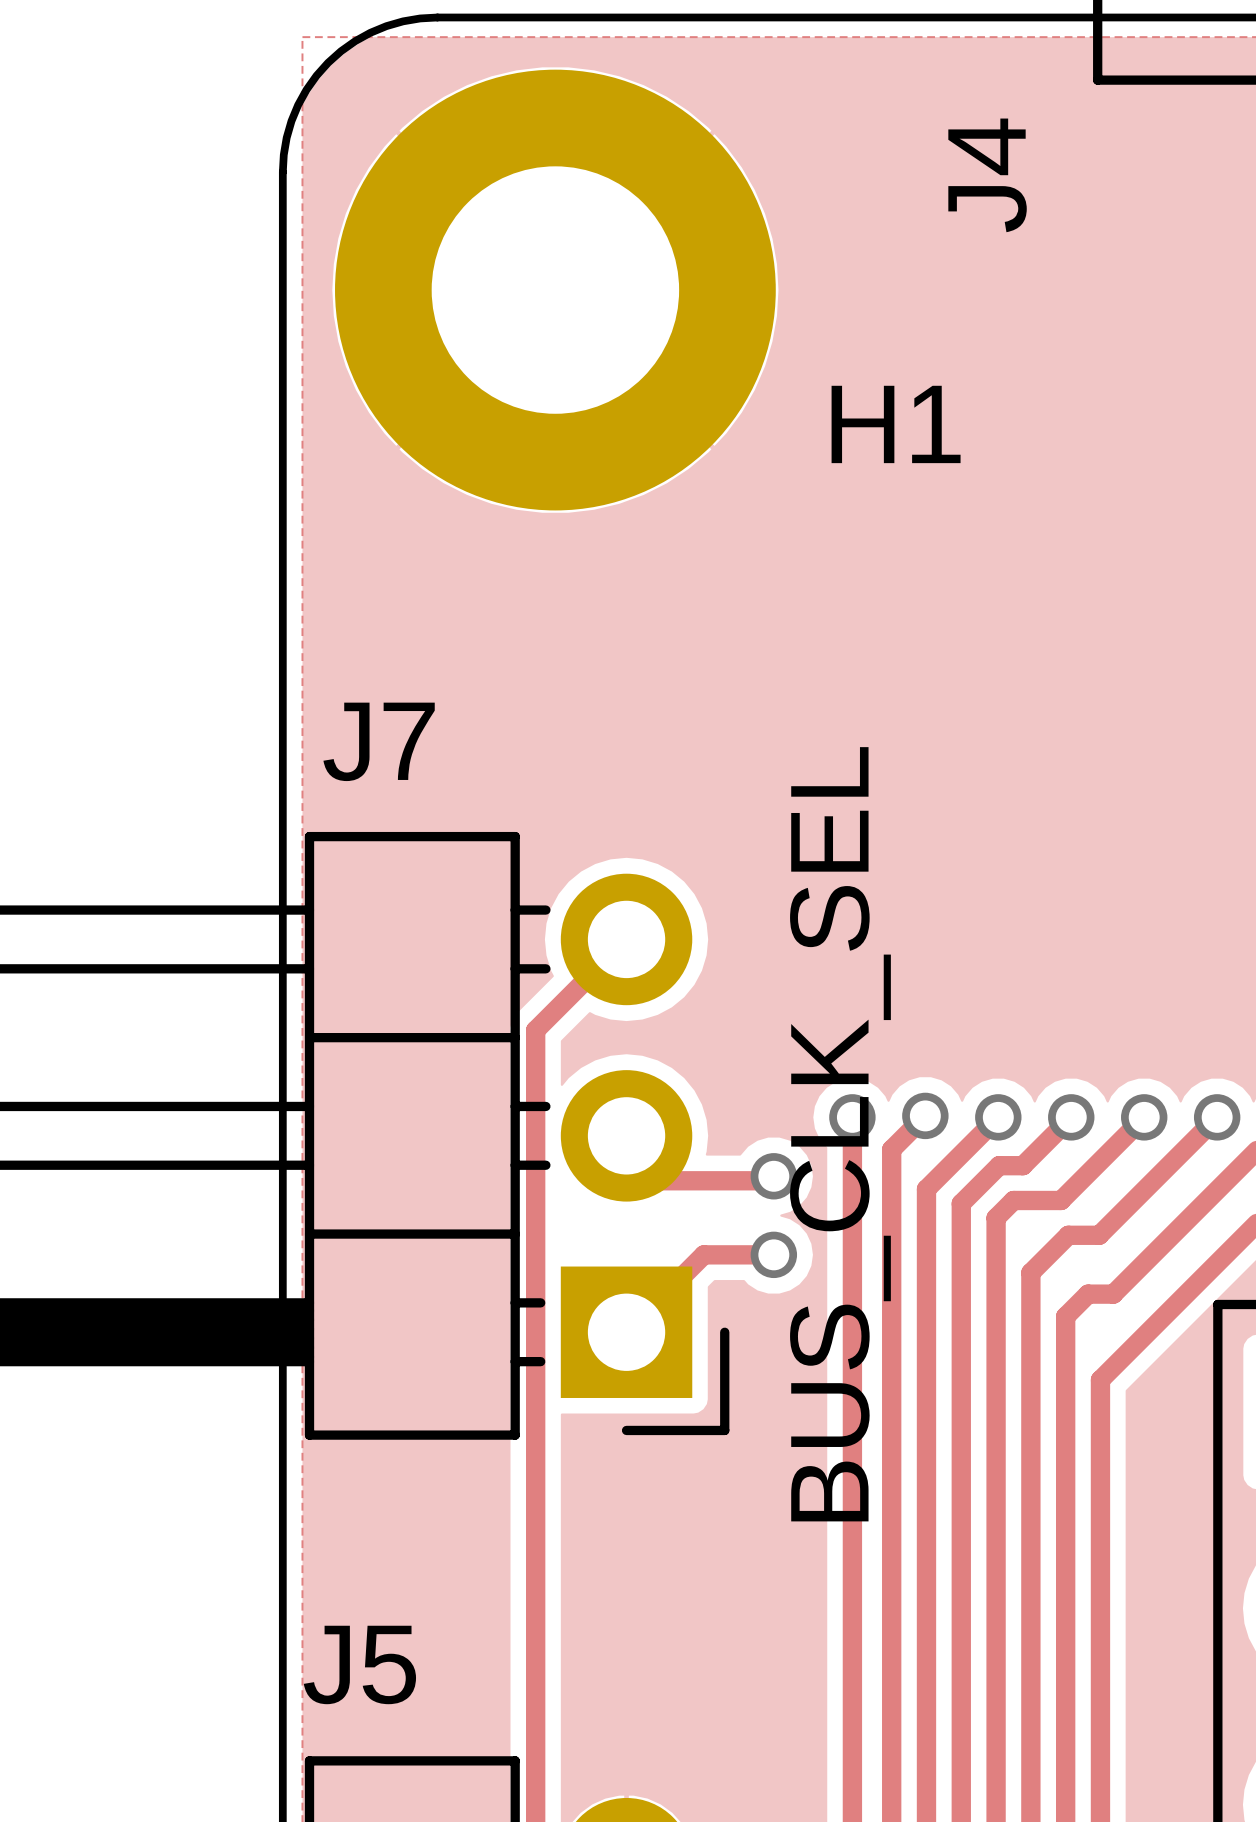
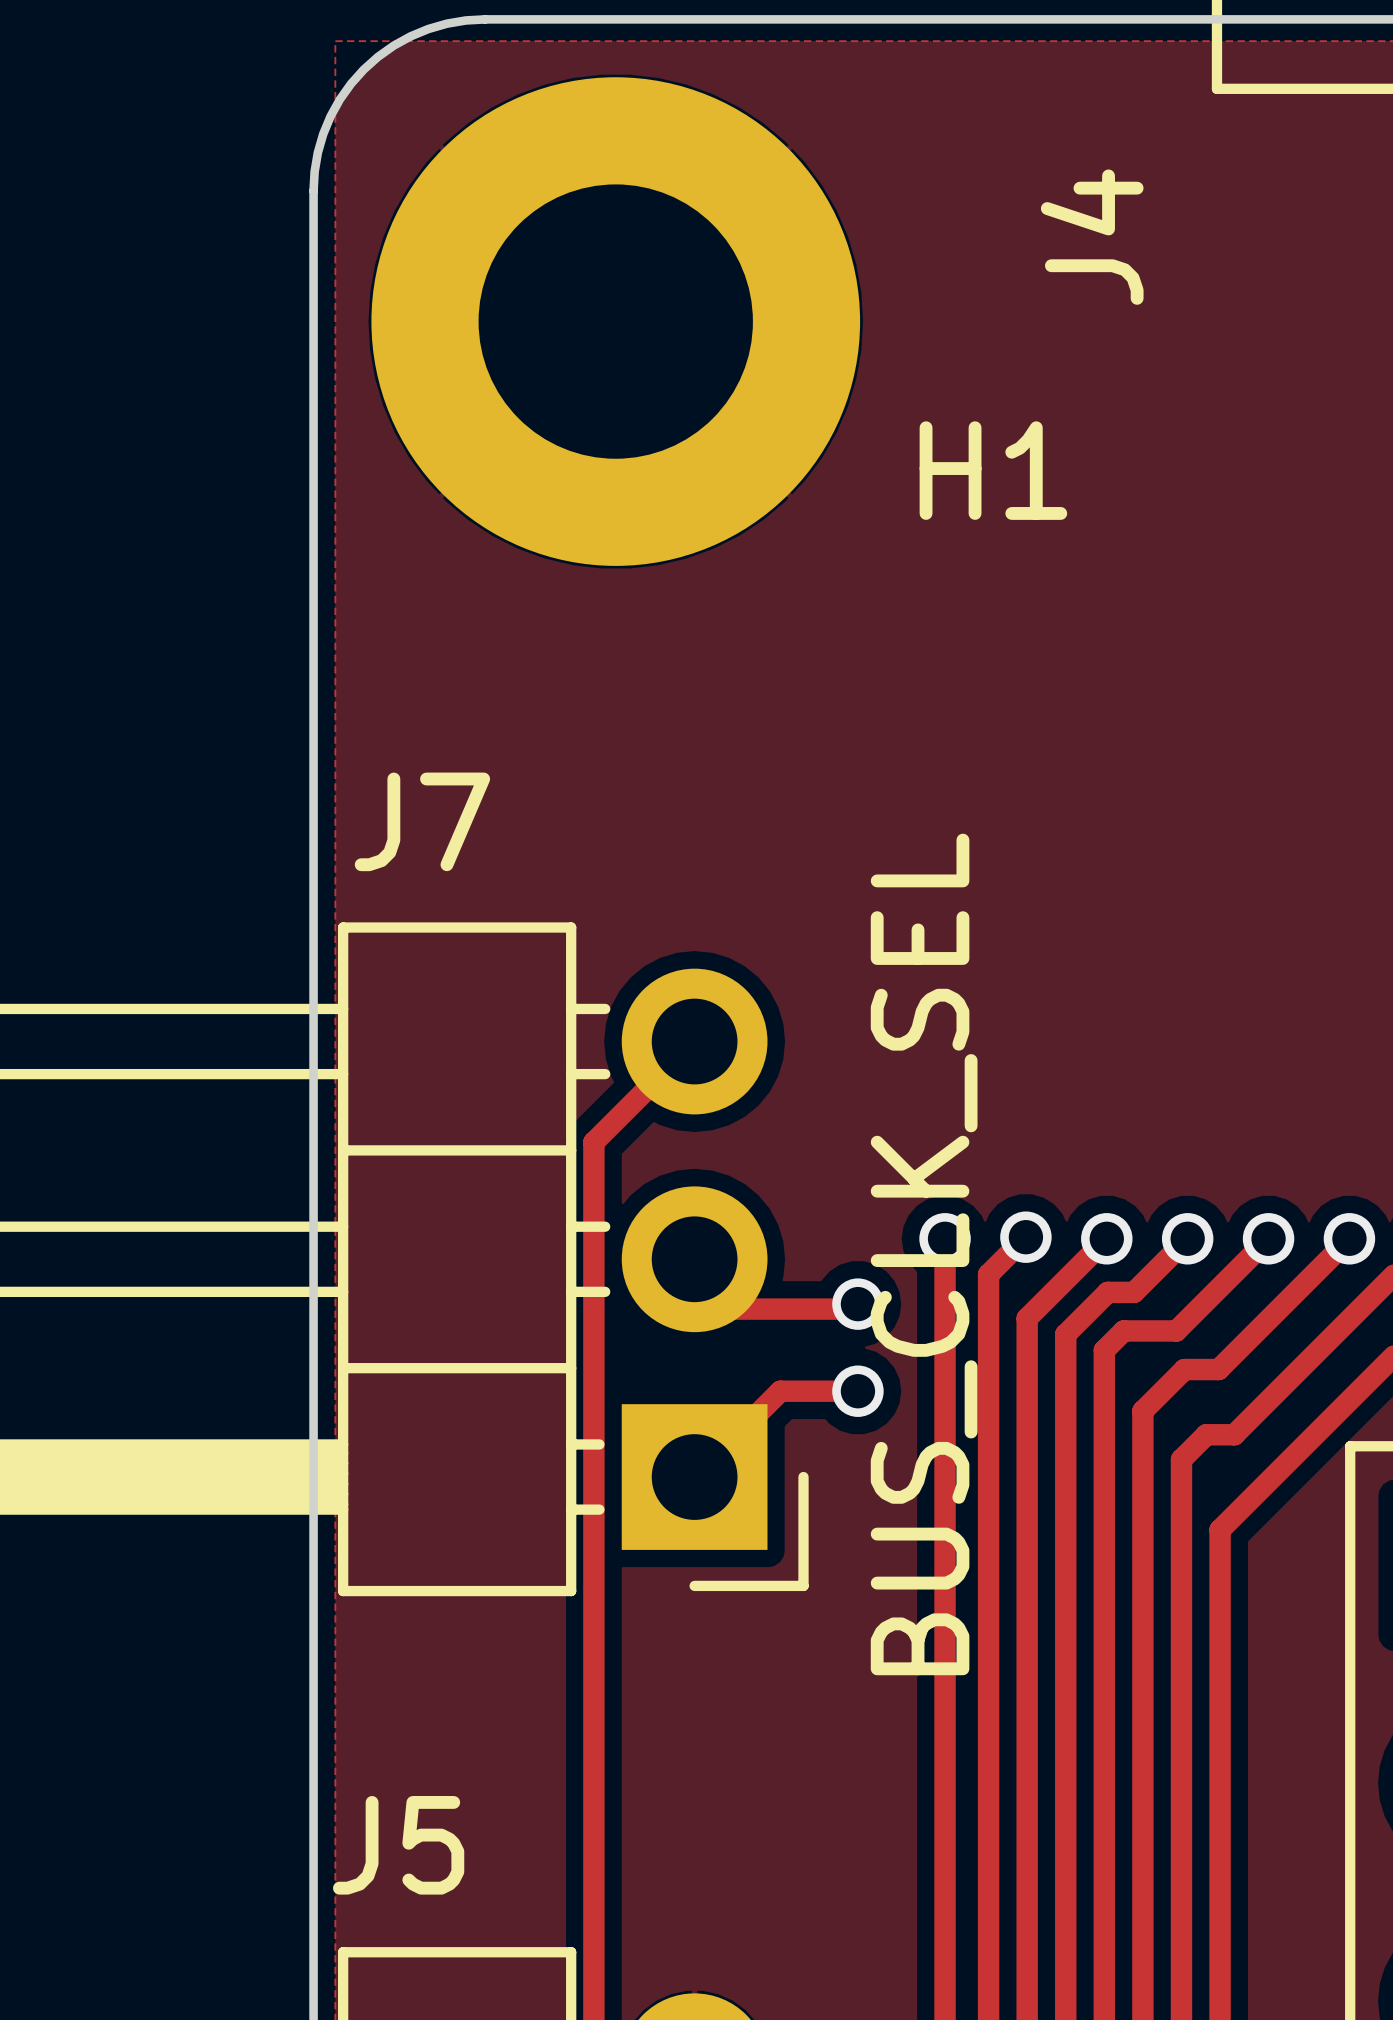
J4 name position: J4 (987, 175) -> J4 (1092, 237)

